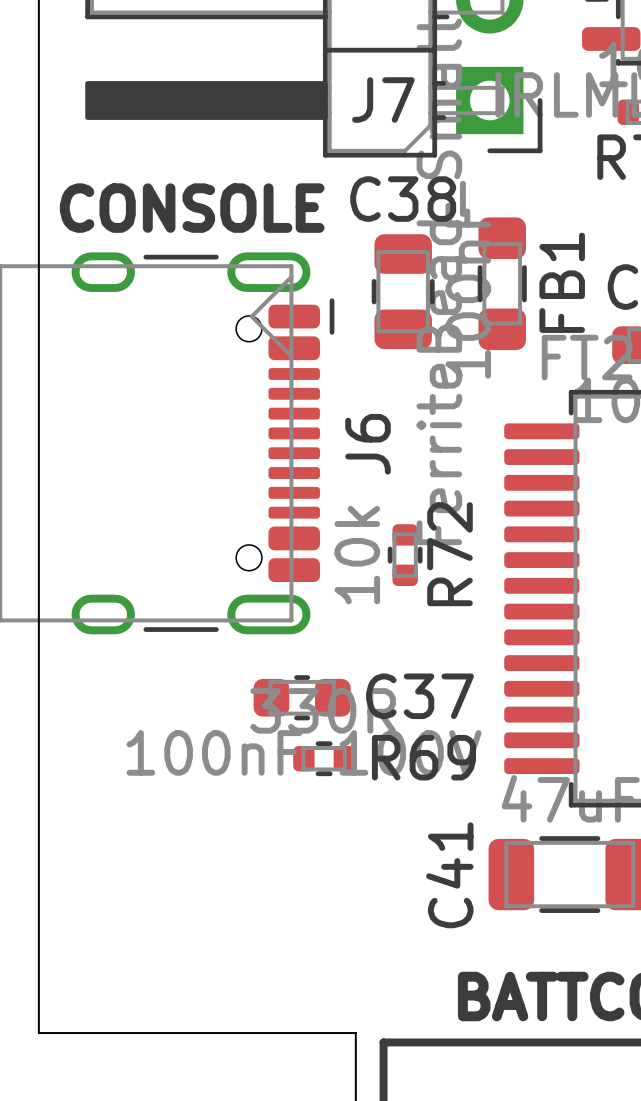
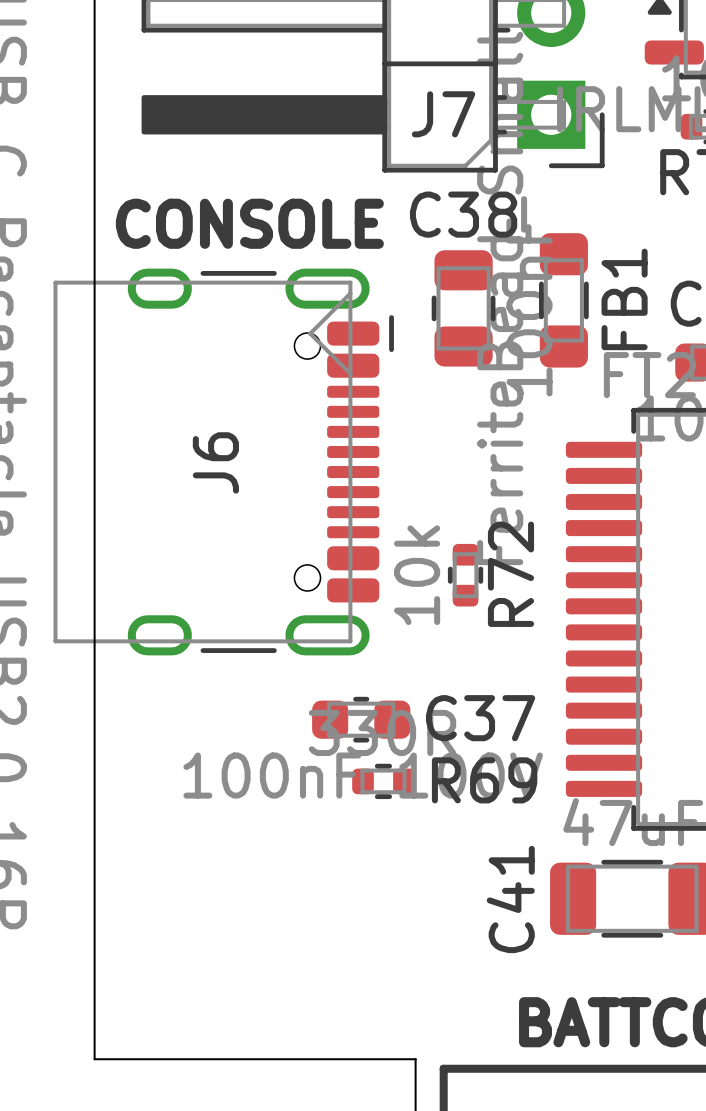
J6 name position: J6 (368, 444) -> J6 (215, 462)

